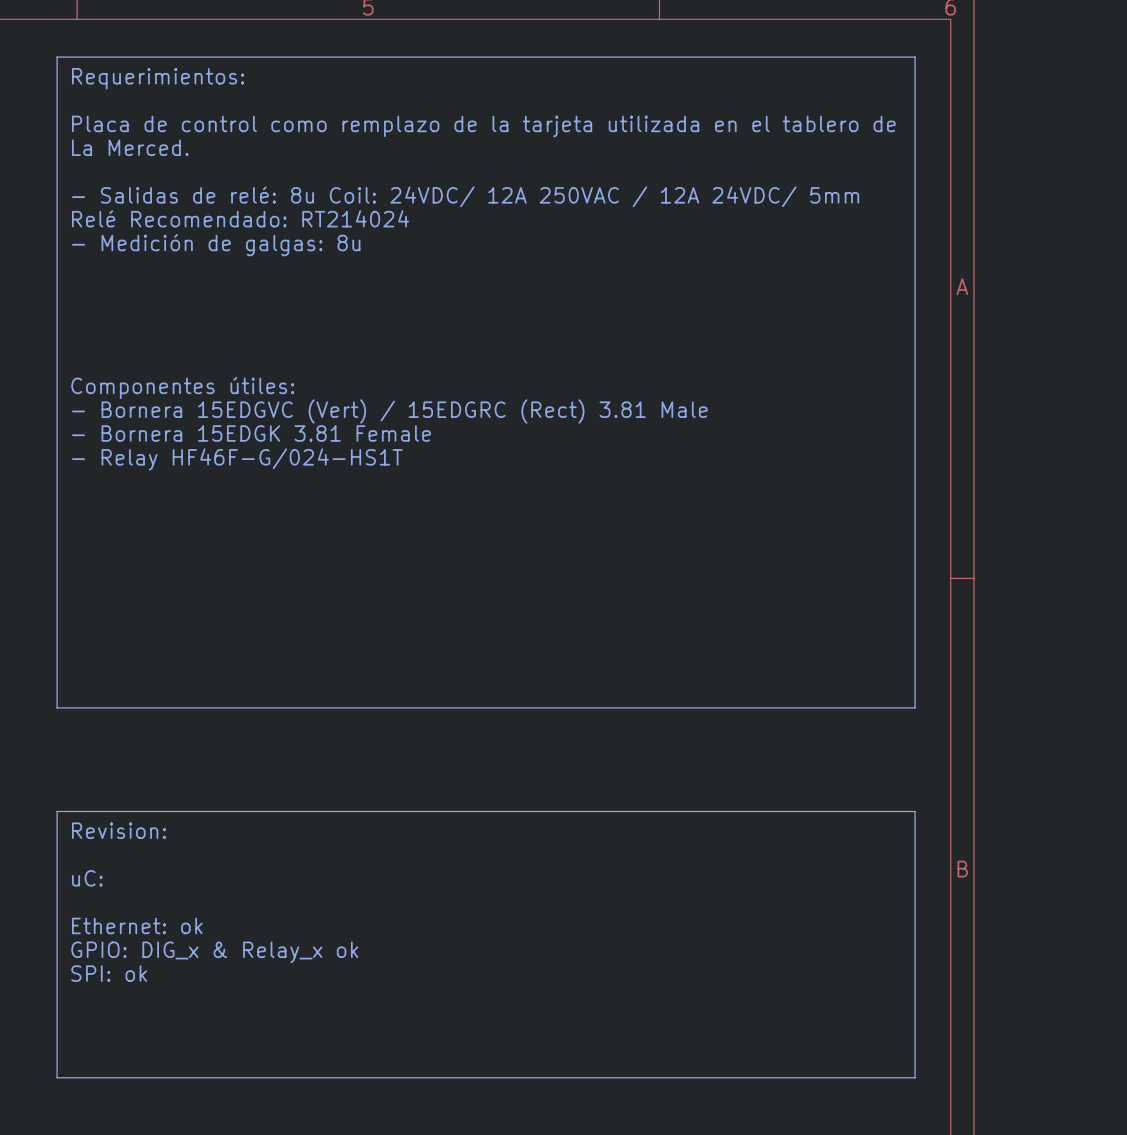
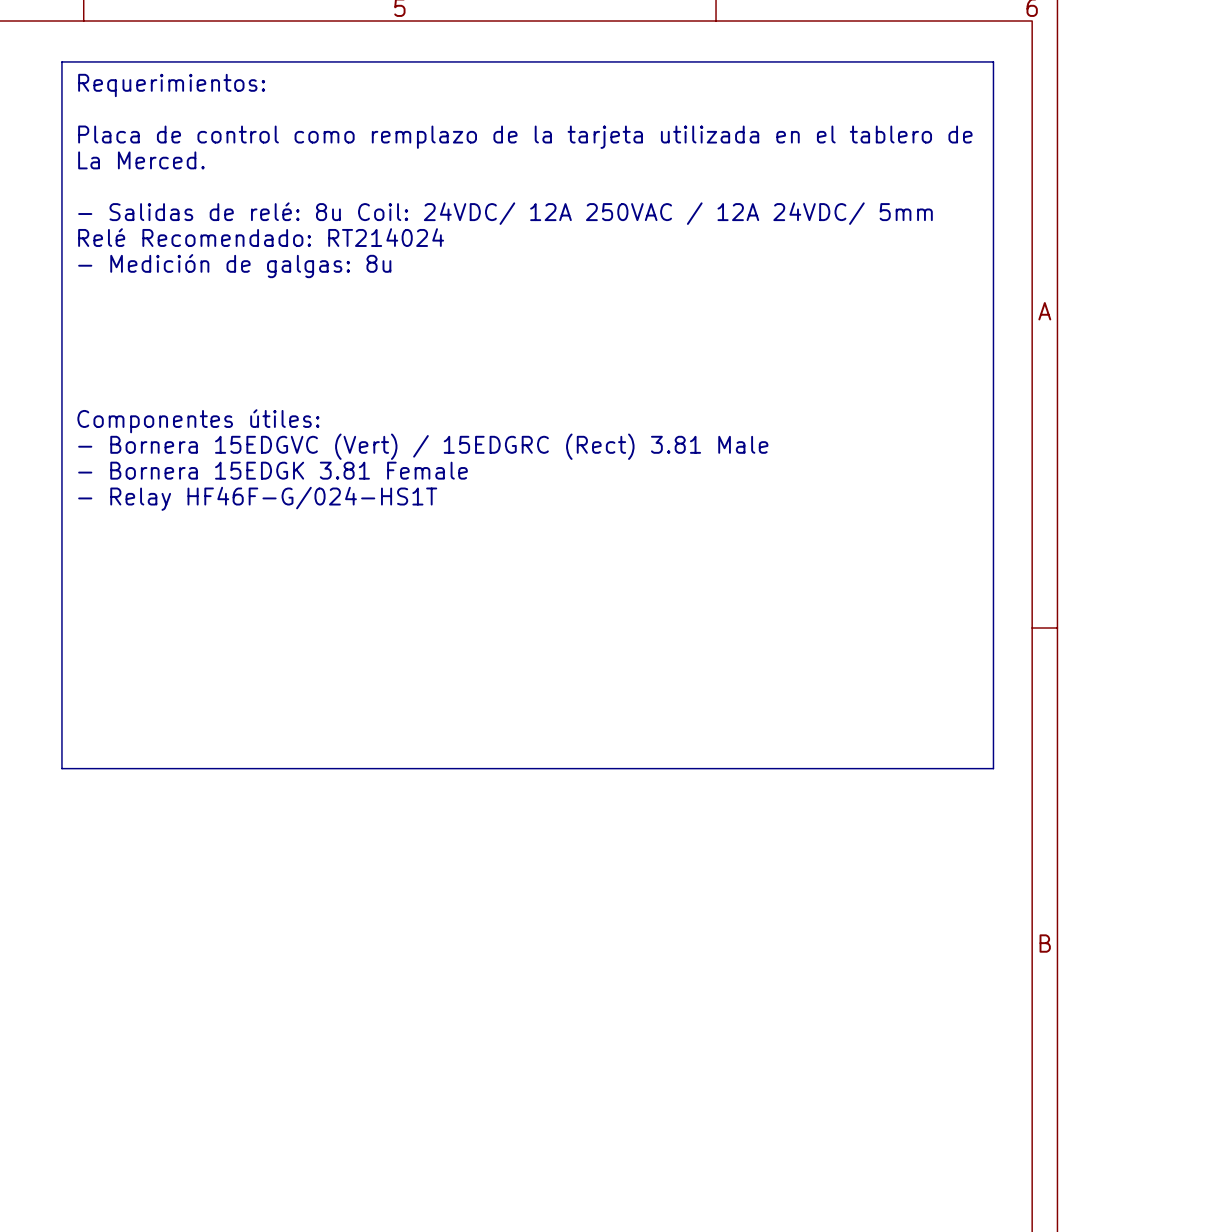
line: (57, 811) (915, 811) (915, 1077) (57, 1077) (57, 811) -> none
text: Revision: (119, 830) -> none
text: uC: (87, 878) -> none
text: Ethernet: ok (137, 925) -> none
text: GPIO: DIG_x & Relay_x ok (214, 952) -> none
text: SPI: ok (109, 973) -> none

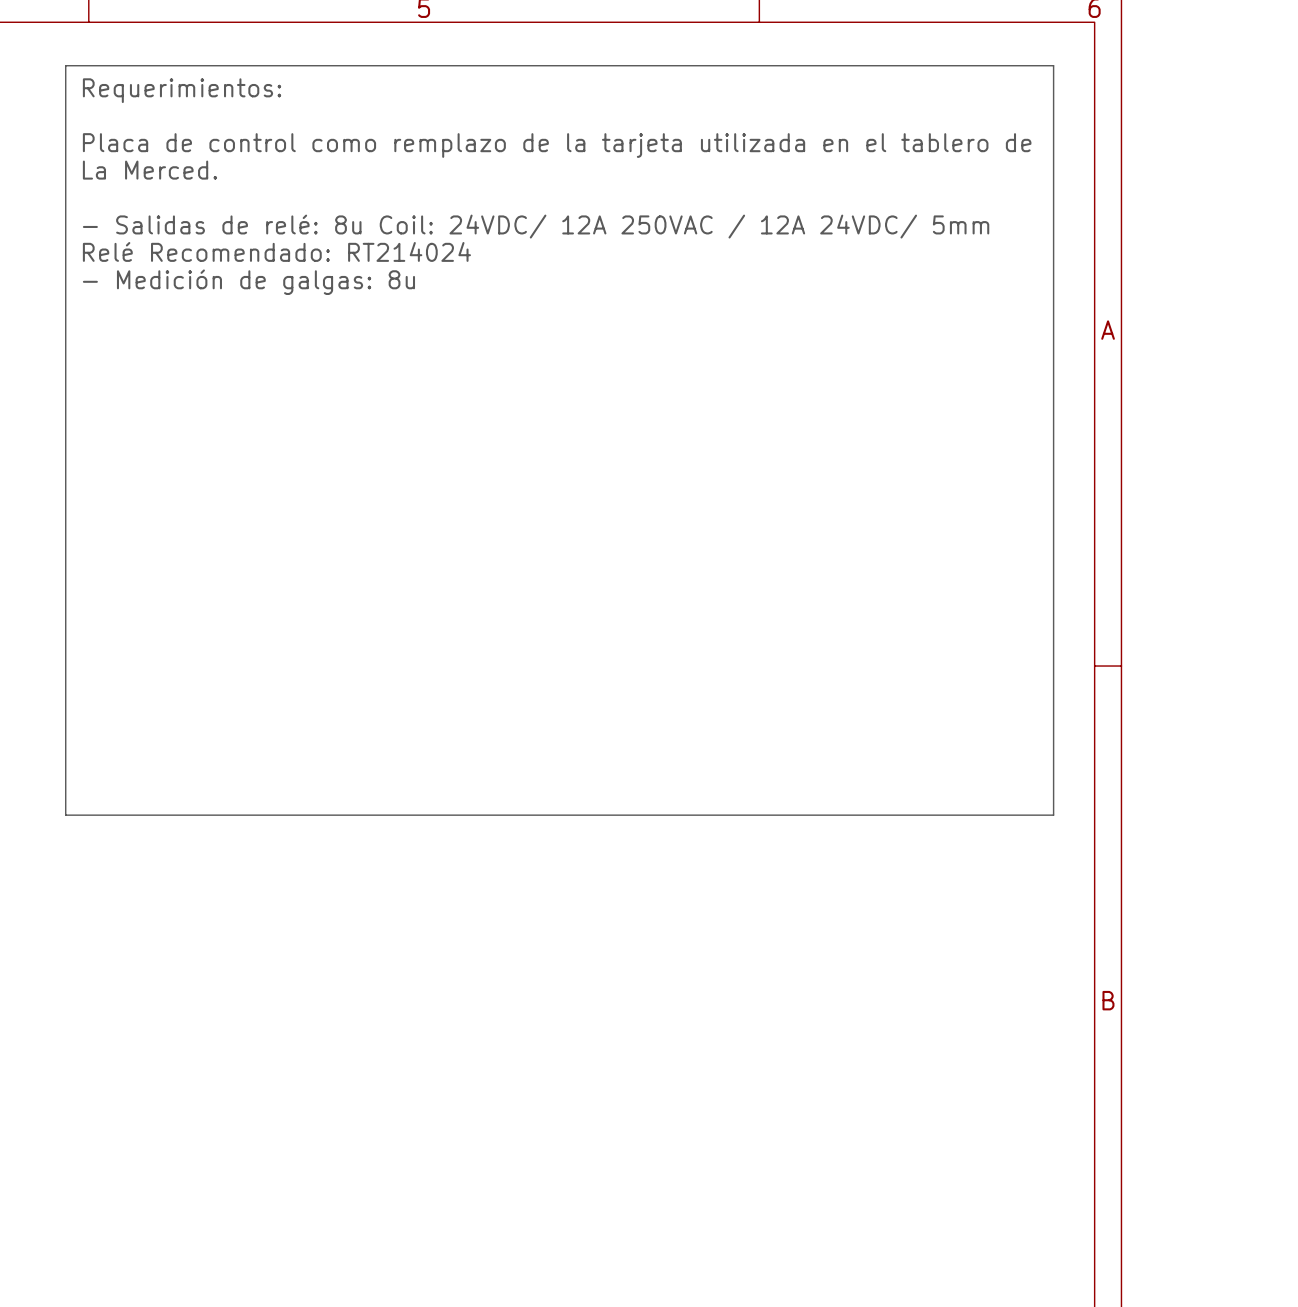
text: Componentes útiles: (198, 421) -> none
text: - Bornera 15EDGVC (Vert) / 15EDGRC (Rect) 3.81 Male (423, 446) -> none
text: - Bornera 15EDGK 3.81 Female (272, 470) -> none
text: - Relay HF46F-G/024-HS1T (257, 498) -> none

